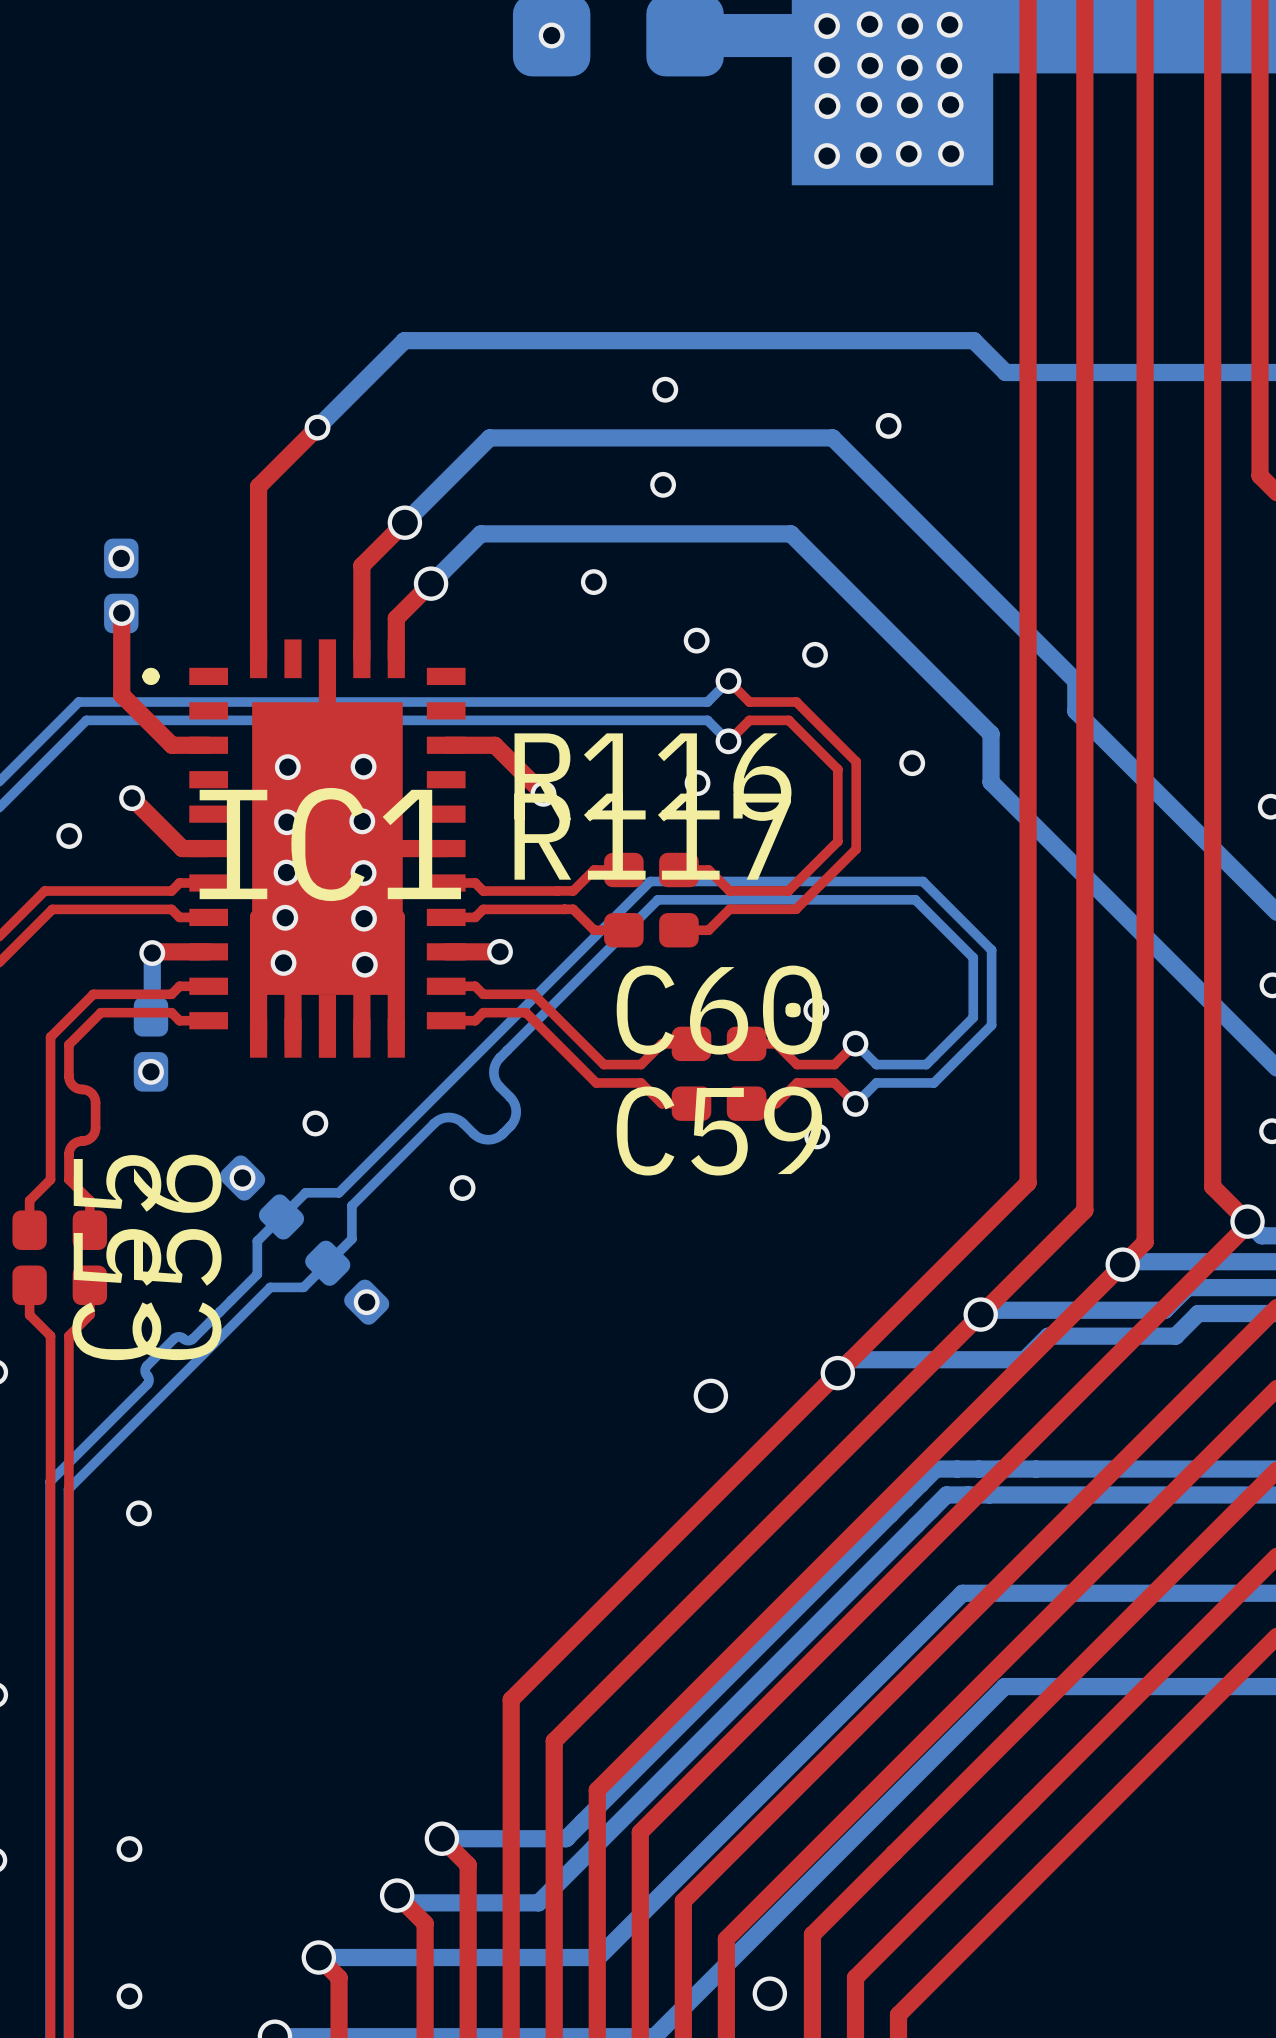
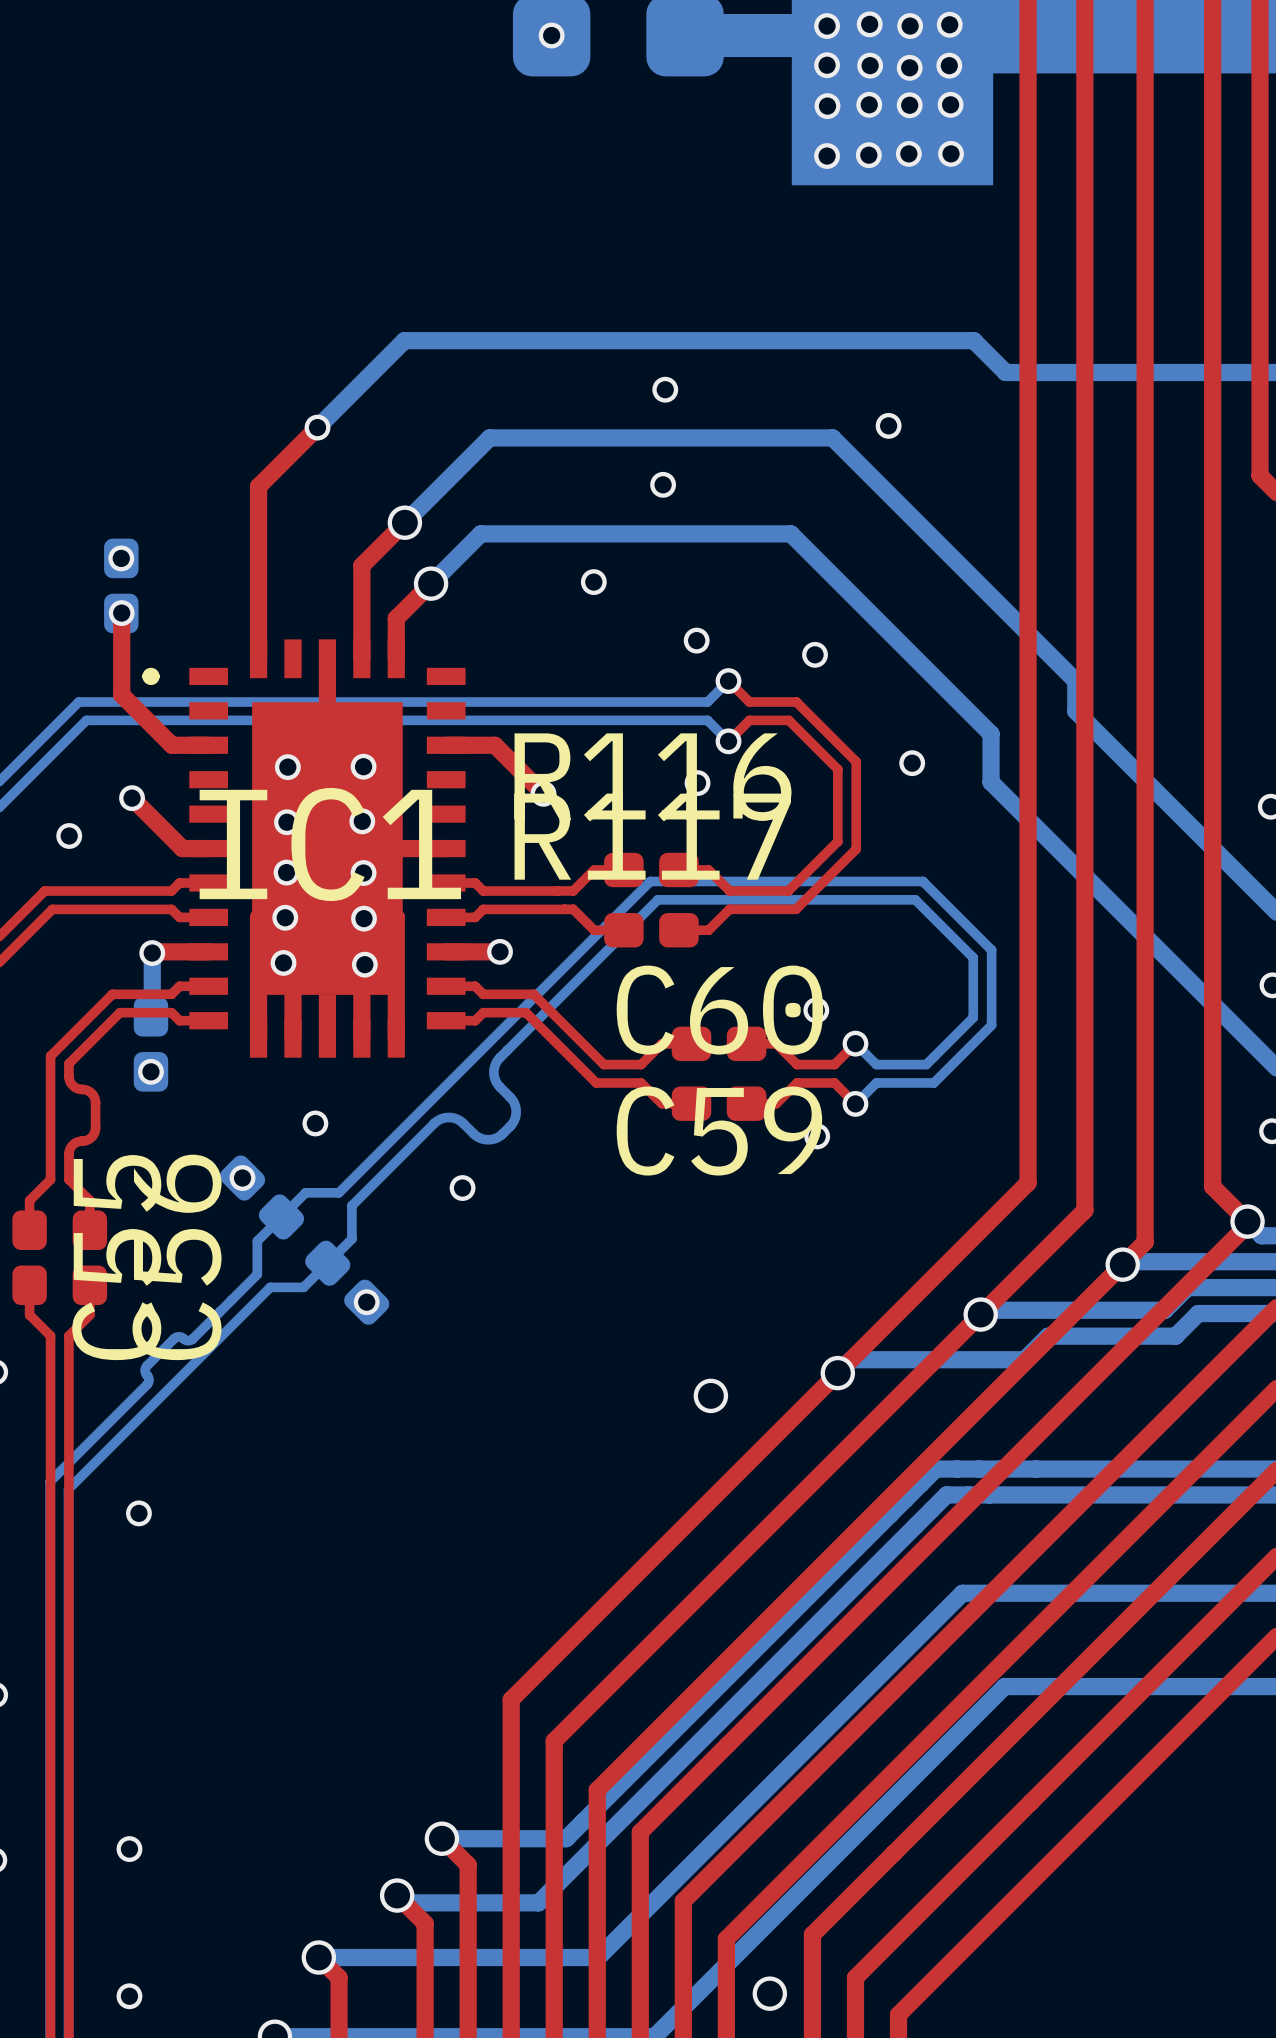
top track: (112, 994) (93, 994) (50, 1037) (50, 1056) -> (112, 994) (50, 1056)
top track: (120, 1012) (100, 1012) (68, 1044) (68, 1063) -> (120, 1012) (68, 1063)

